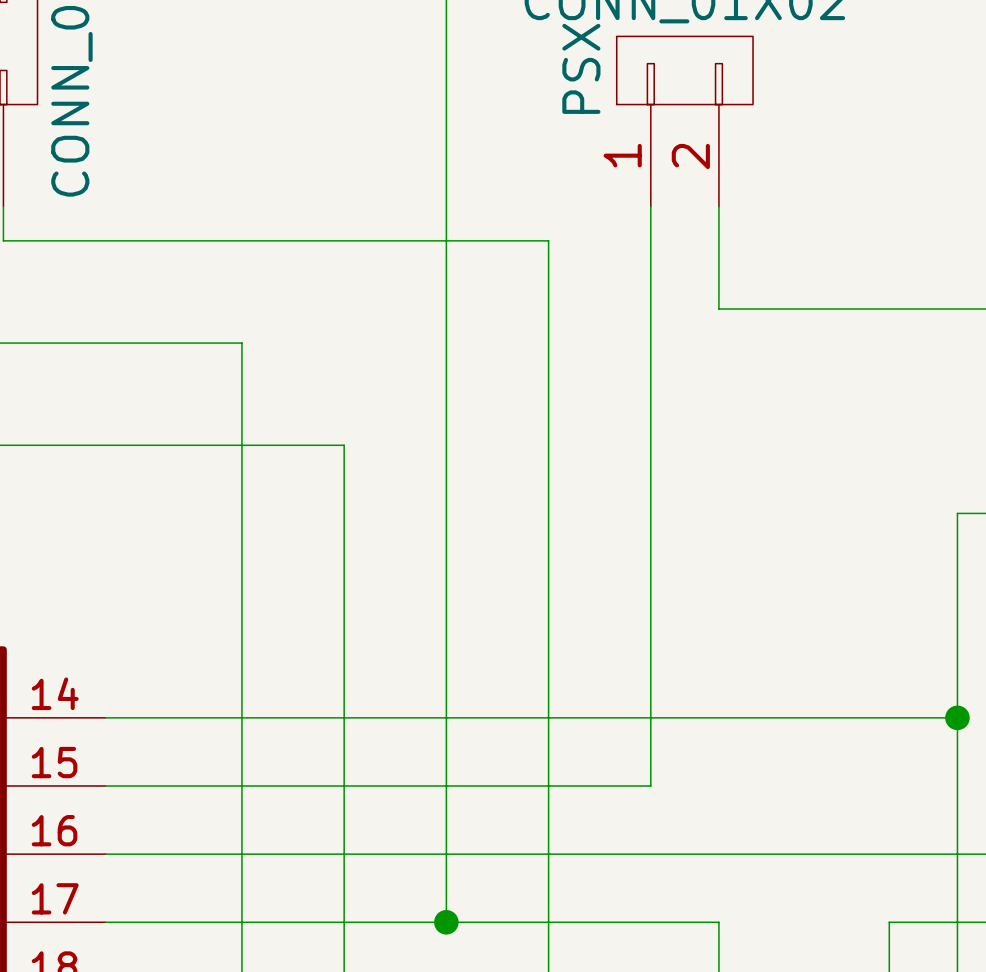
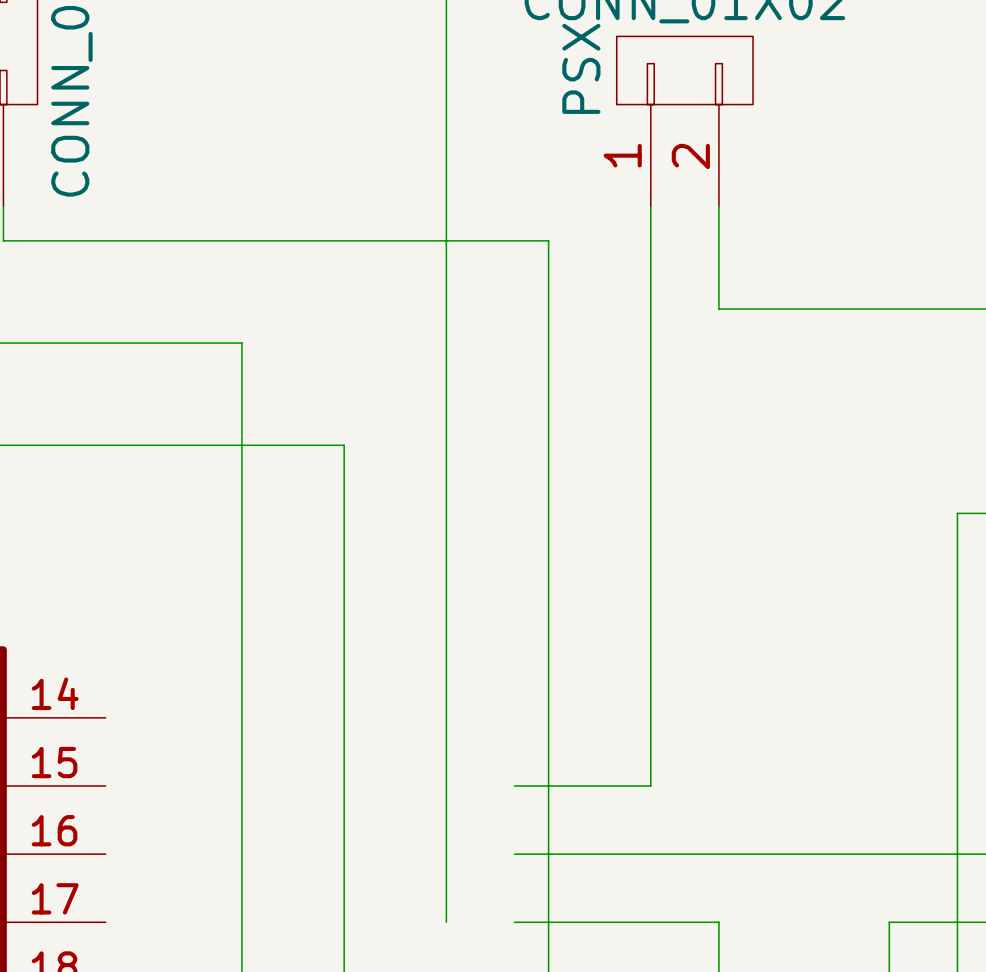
wire: (105, 717) (957, 717) -> none
junction: (957, 717) -> none
wire: (105, 785) (514, 785) -> none
wire: (105, 854) (514, 854) -> none
wire: (105, 922) (514, 922) -> none
junction: (446, 922) -> none

